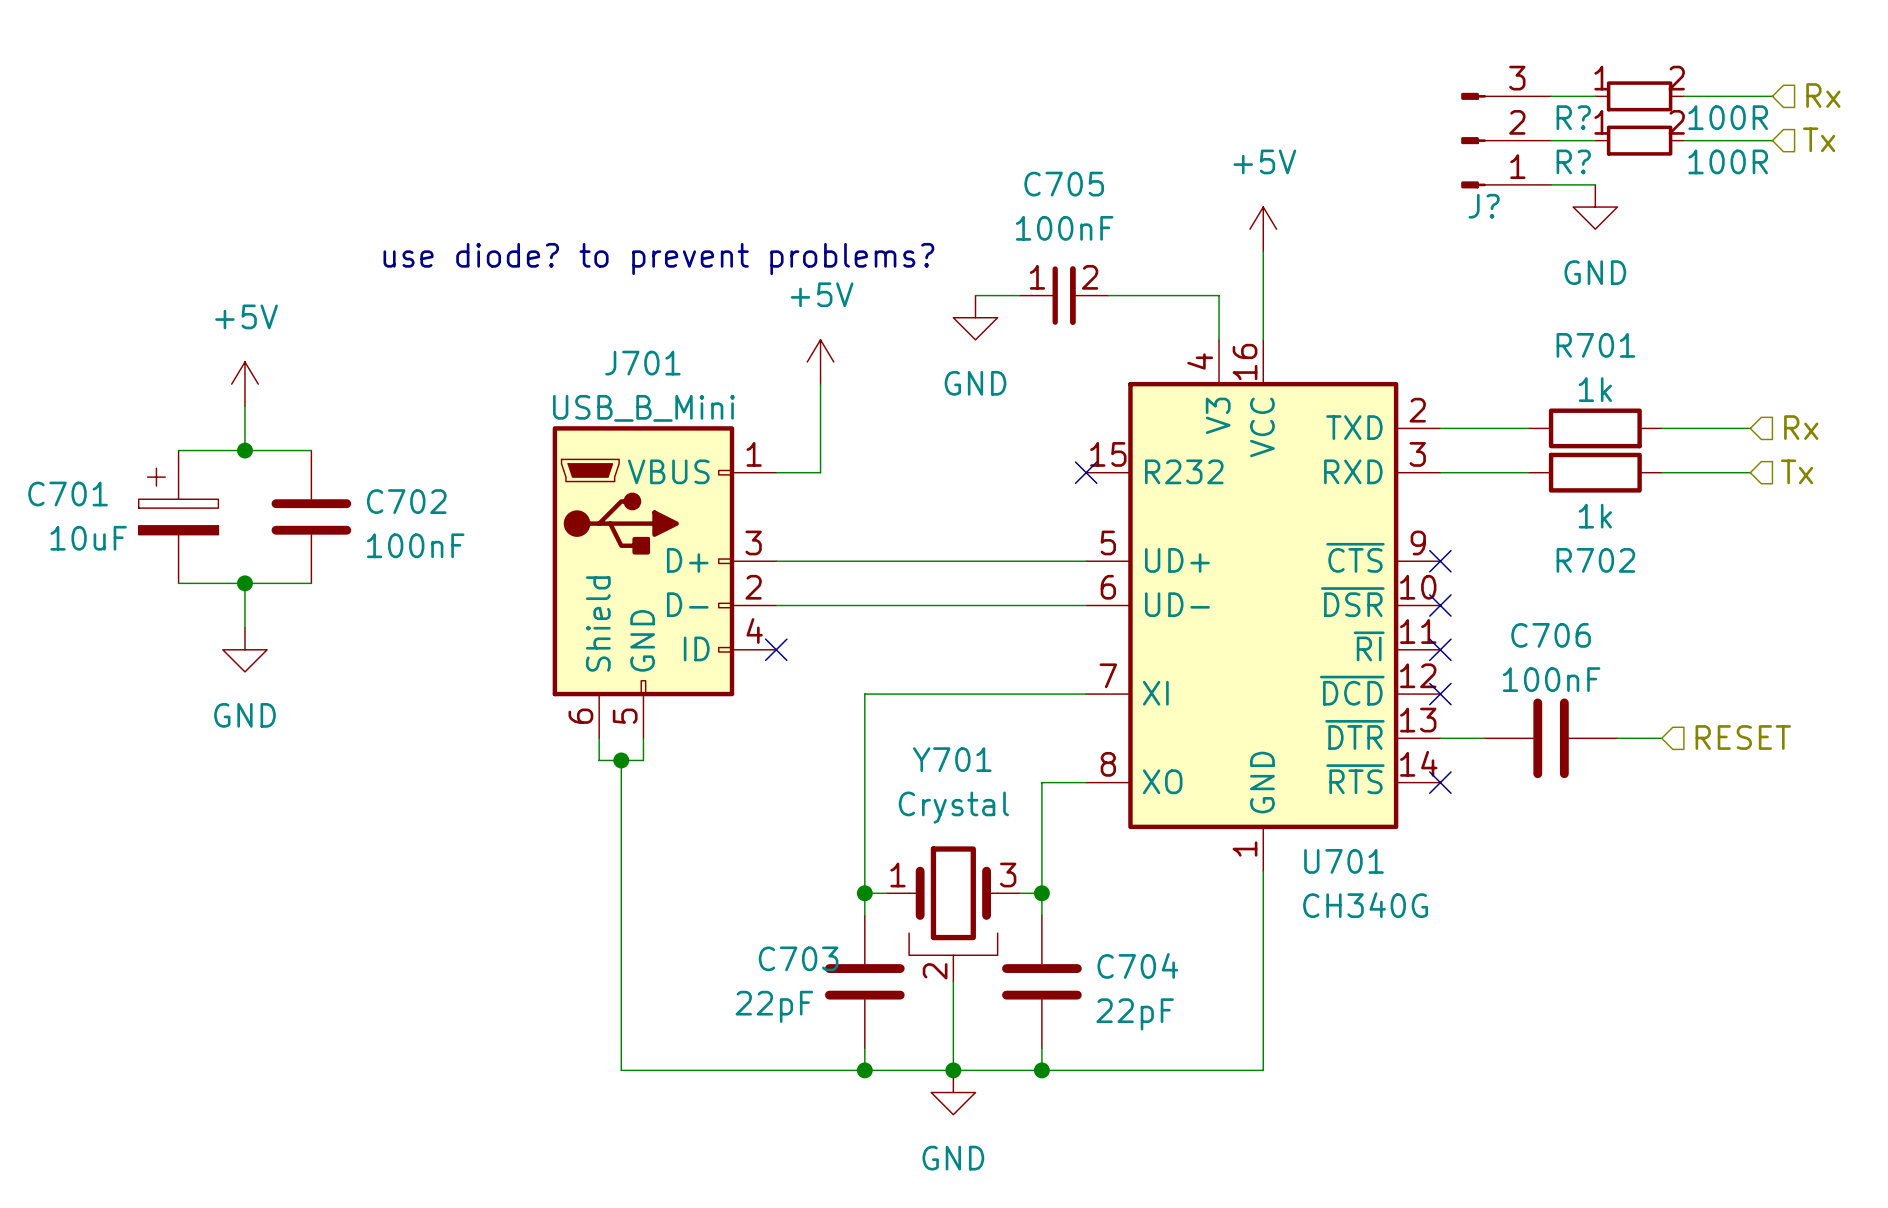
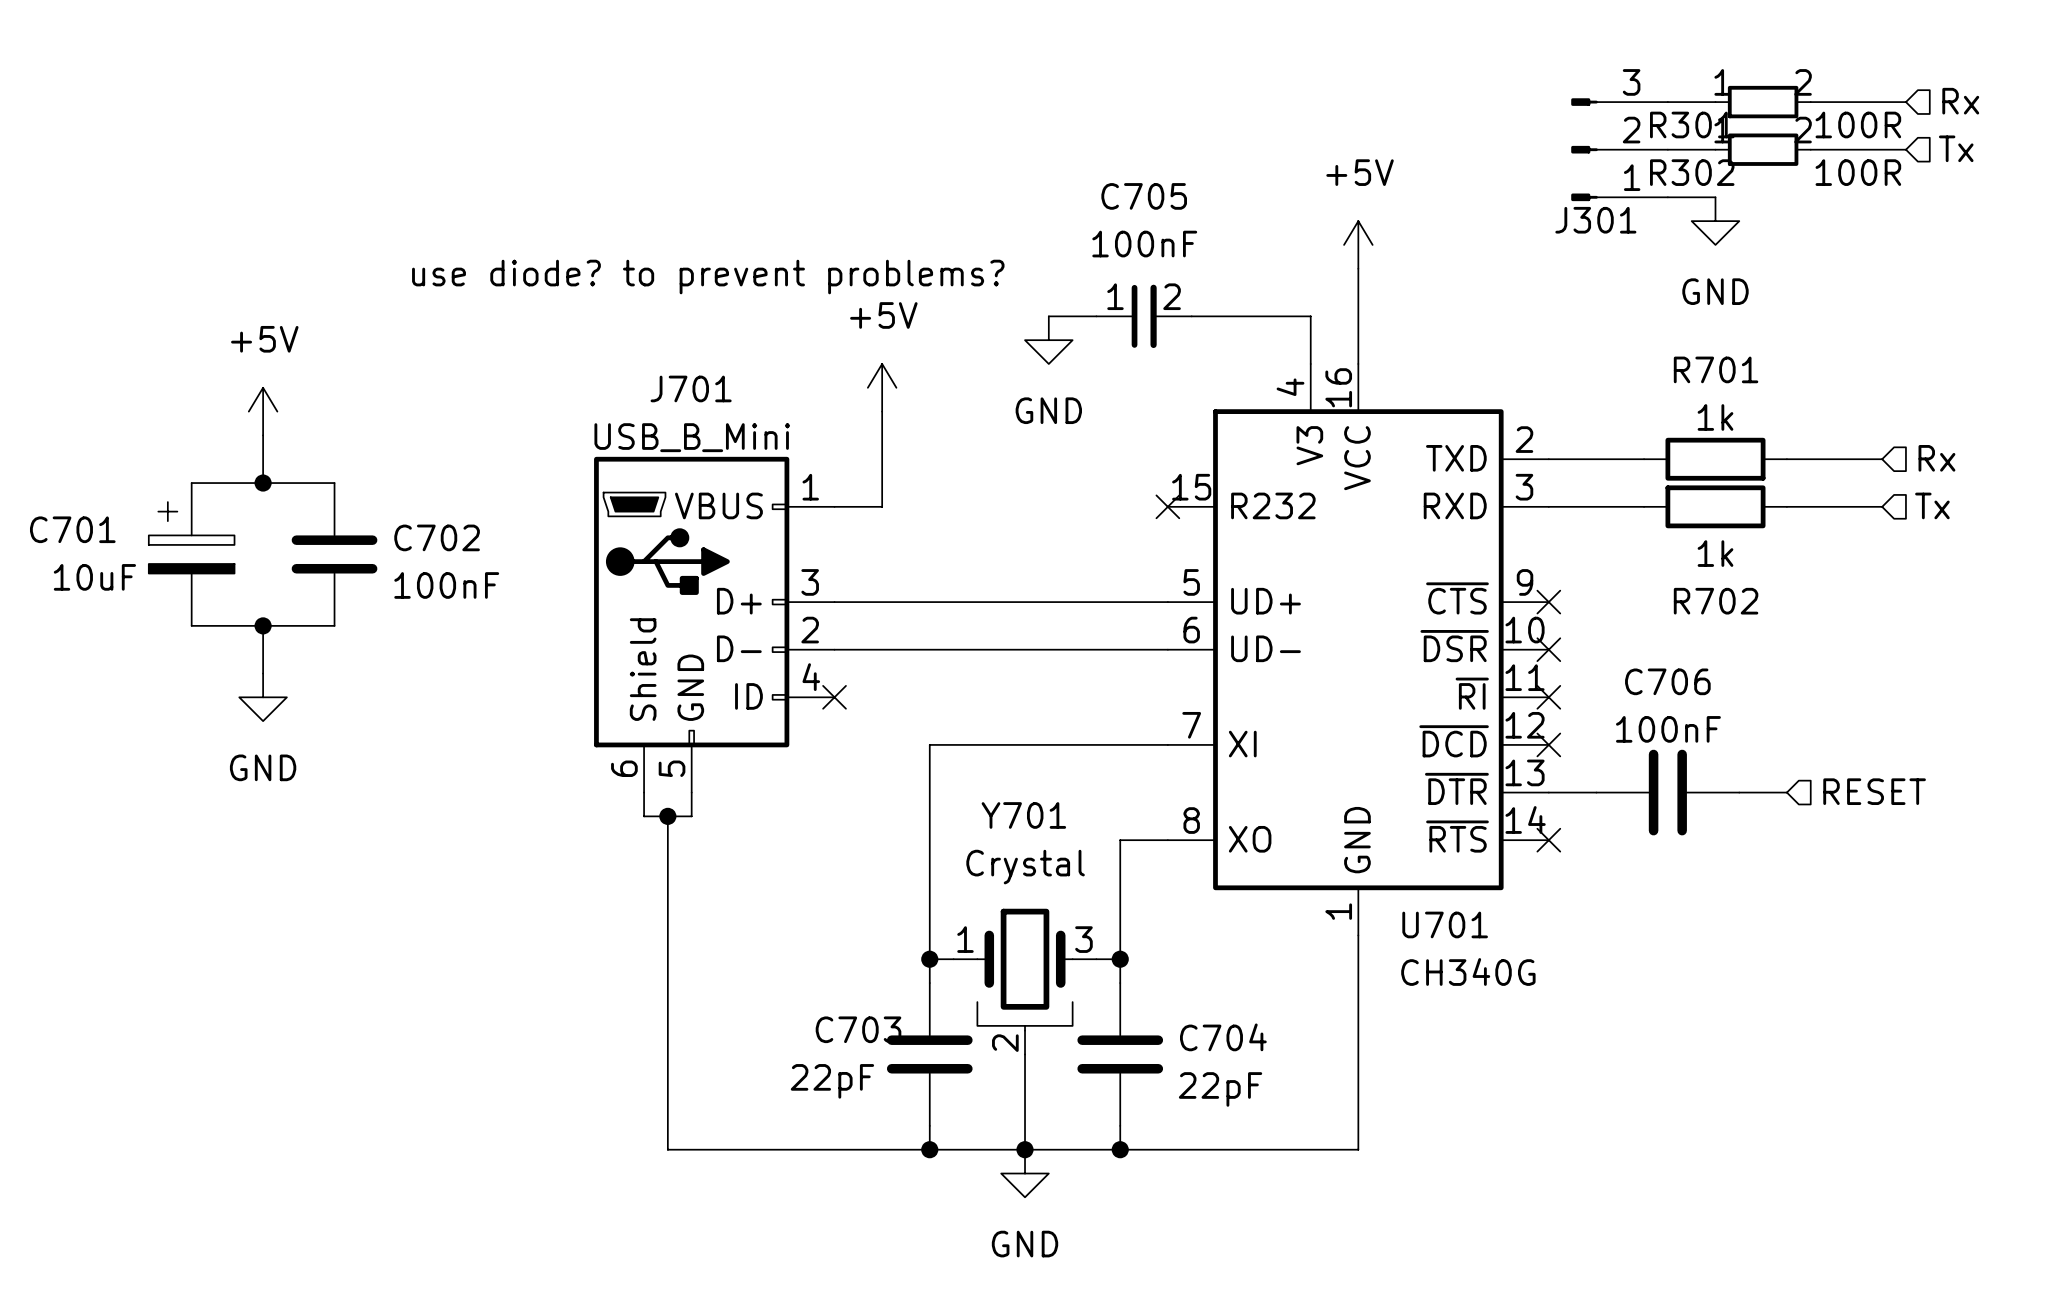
R? name: R? (1573, 117) -> R301 (1692, 124)
R? name: R? (1573, 161) -> R302 (1692, 172)
J? name: J? (1484, 206) -> J301 (1595, 220)

